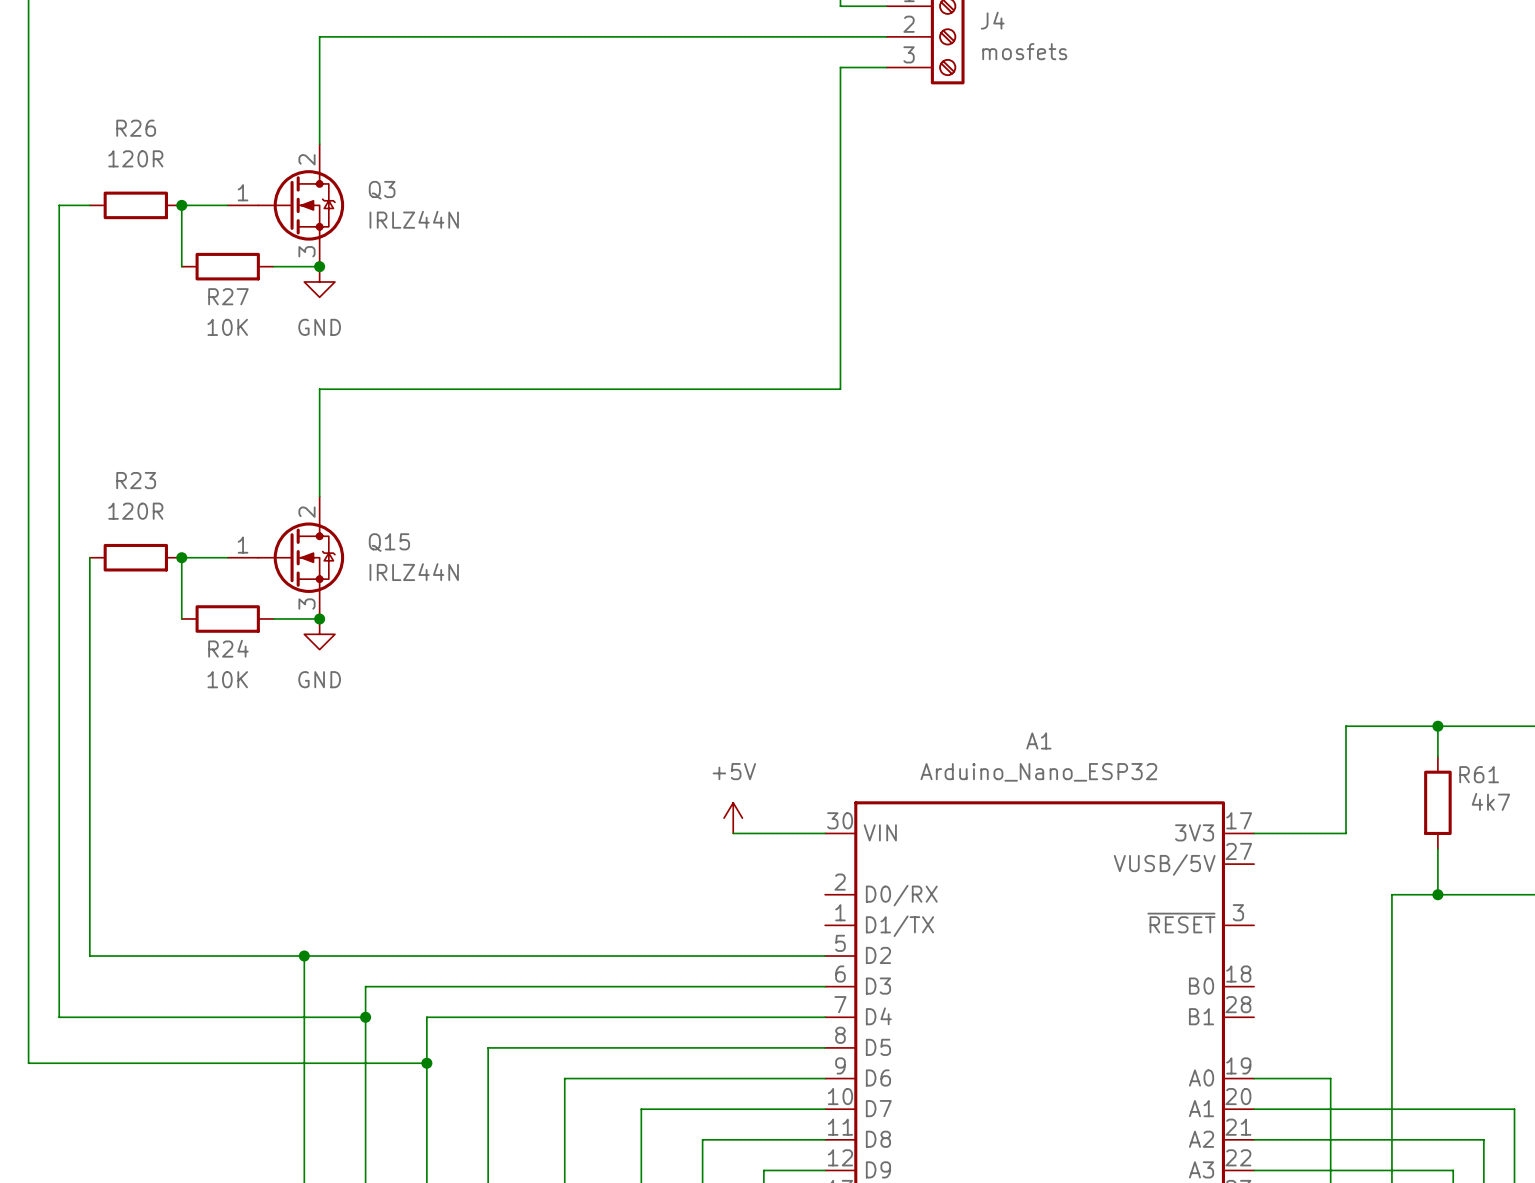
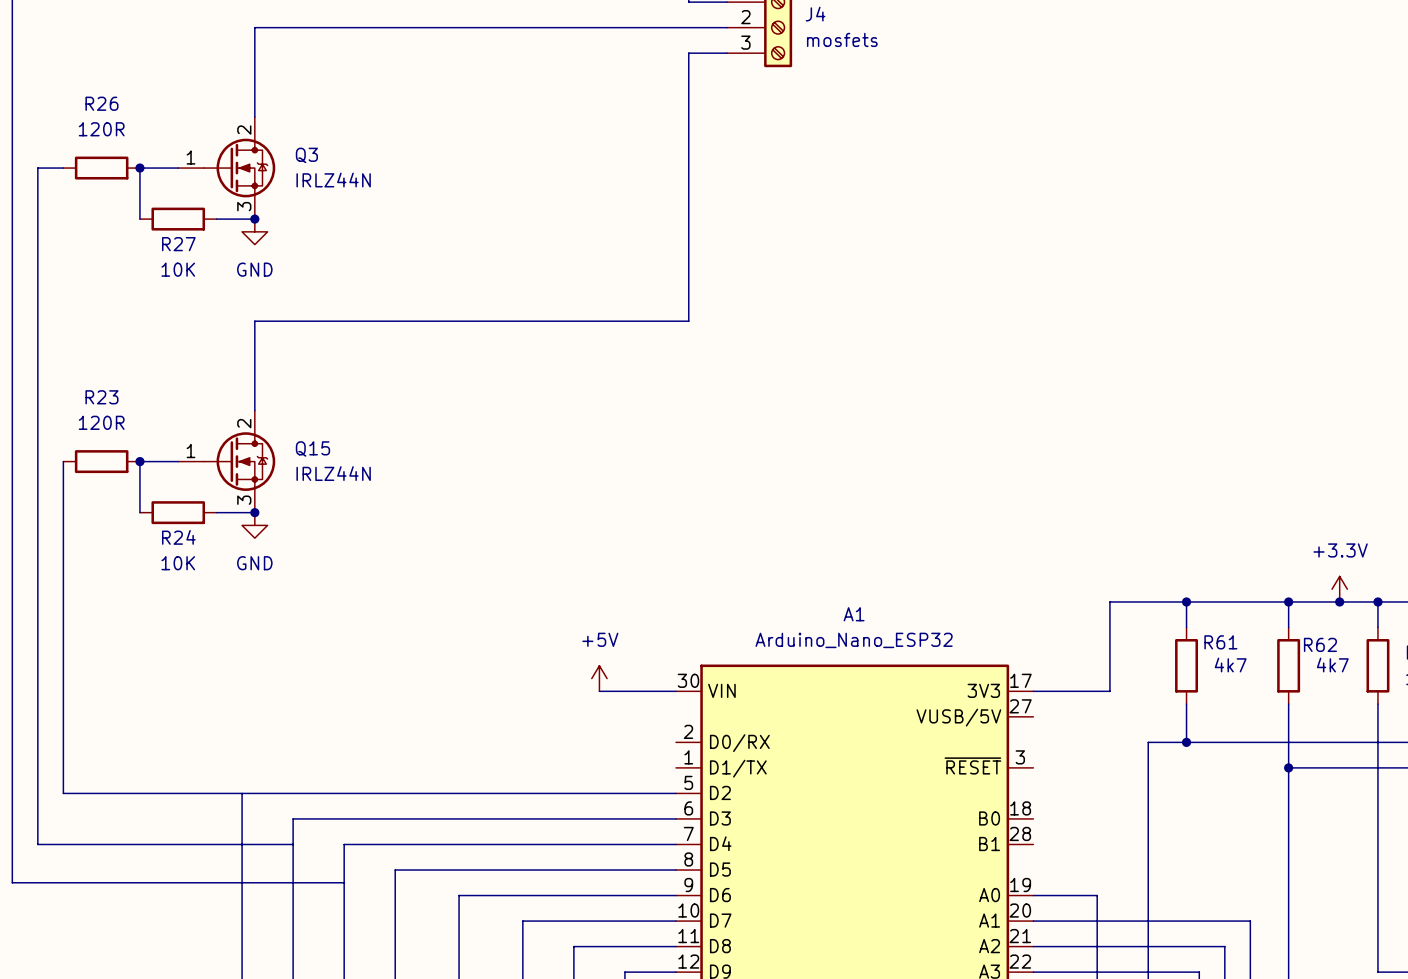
junction: (304, 956) -> none
junction: (365, 1017) -> none
junction: (426, 1063) -> none

